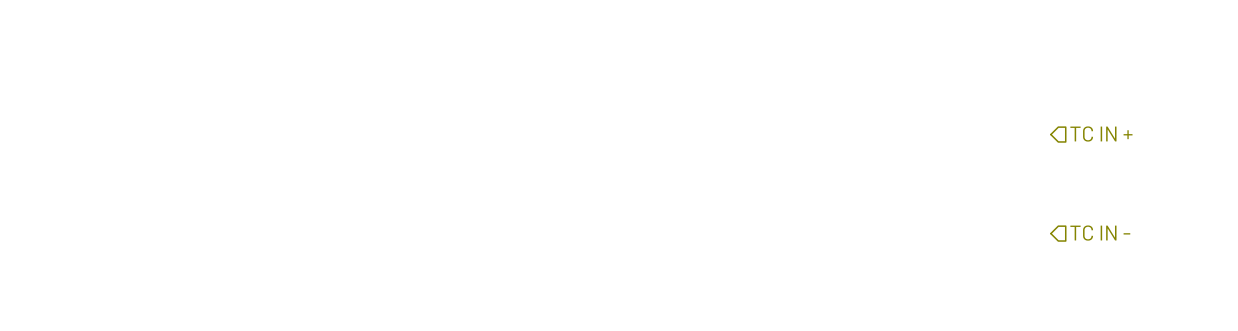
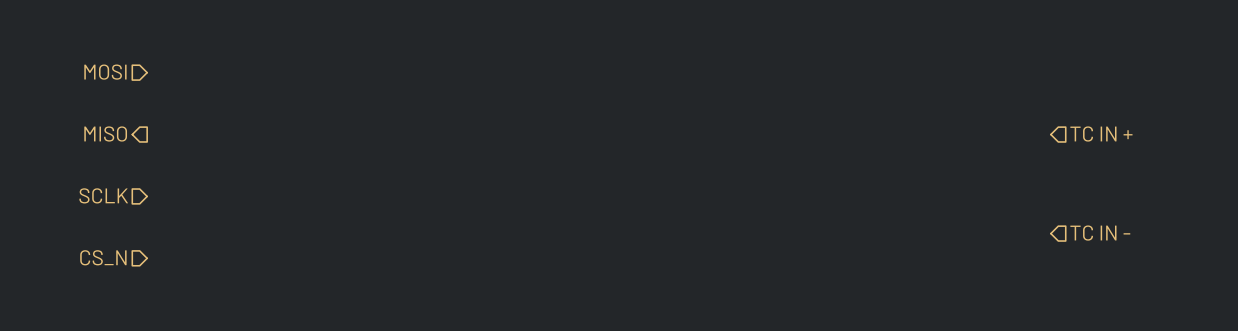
hierarchical label: none -> MOSI (105, 72)
hierarchical label: none -> MISO (105, 133)
hierarchical label: none -> SCLK (103, 195)
hierarchical label: none -> CS_N (103, 257)

